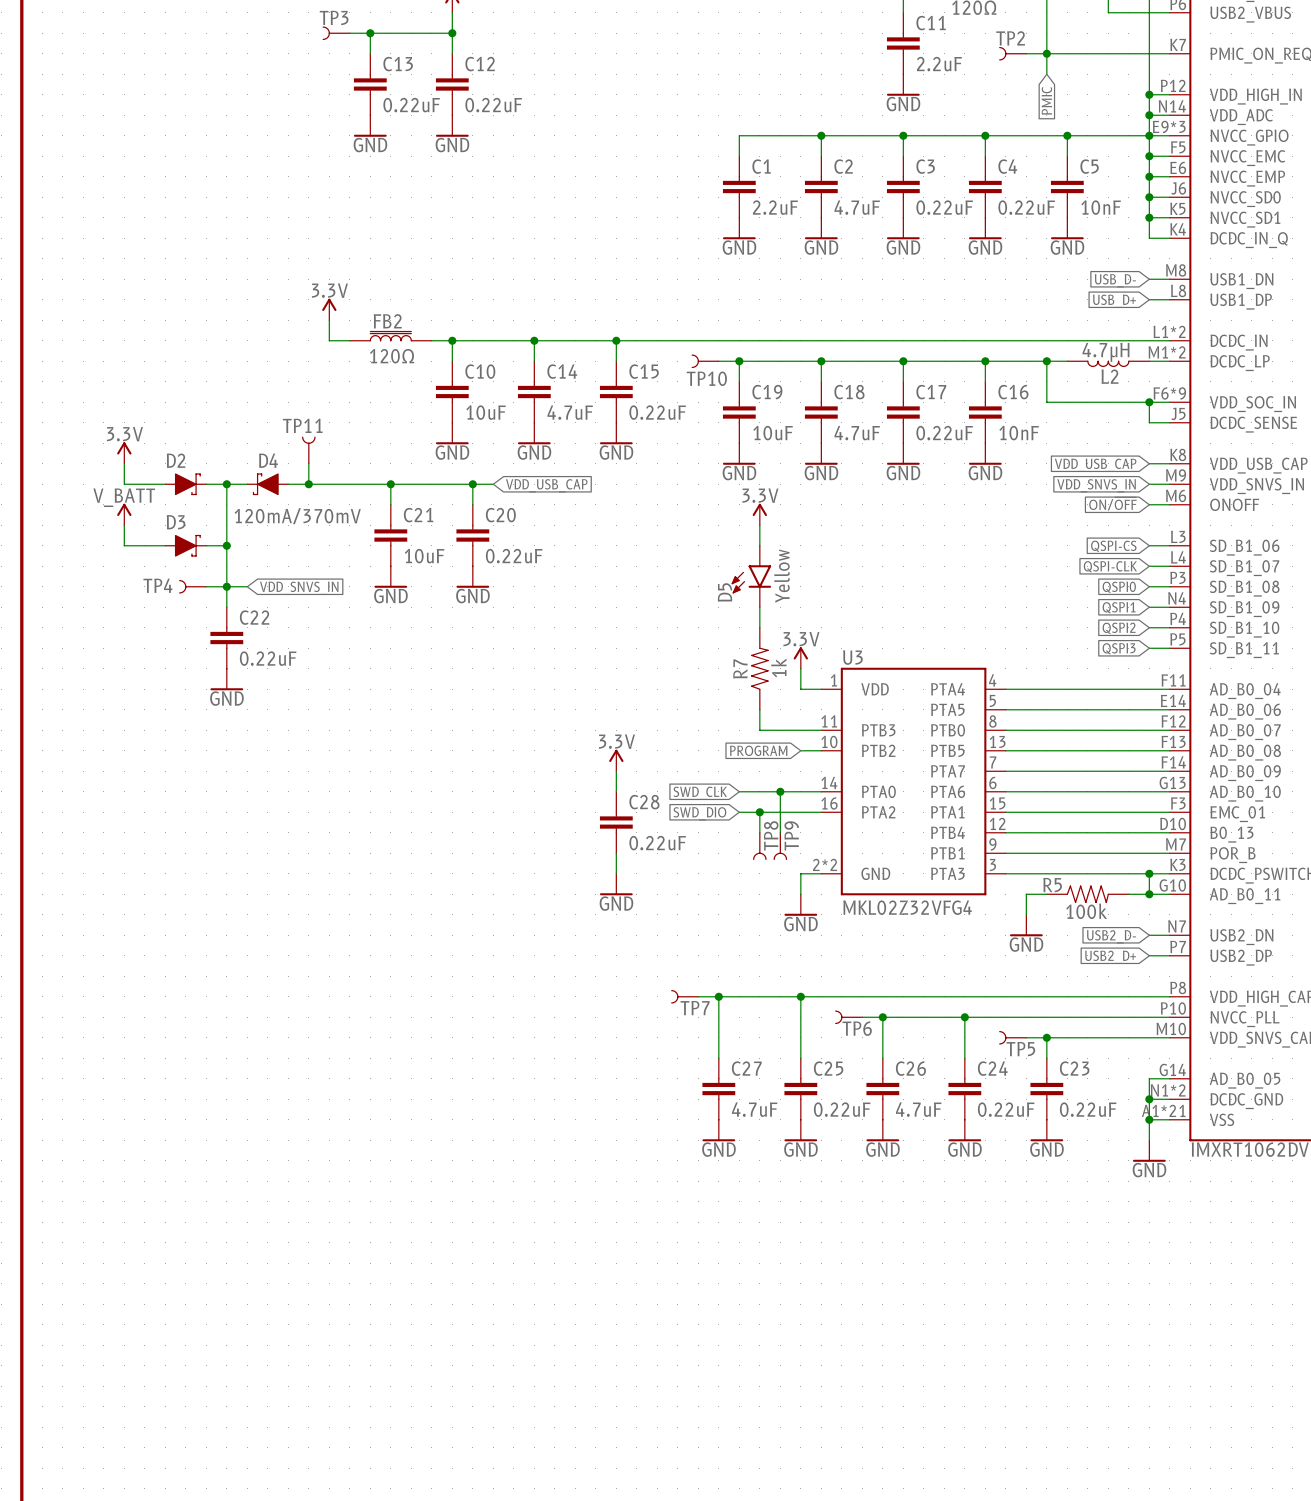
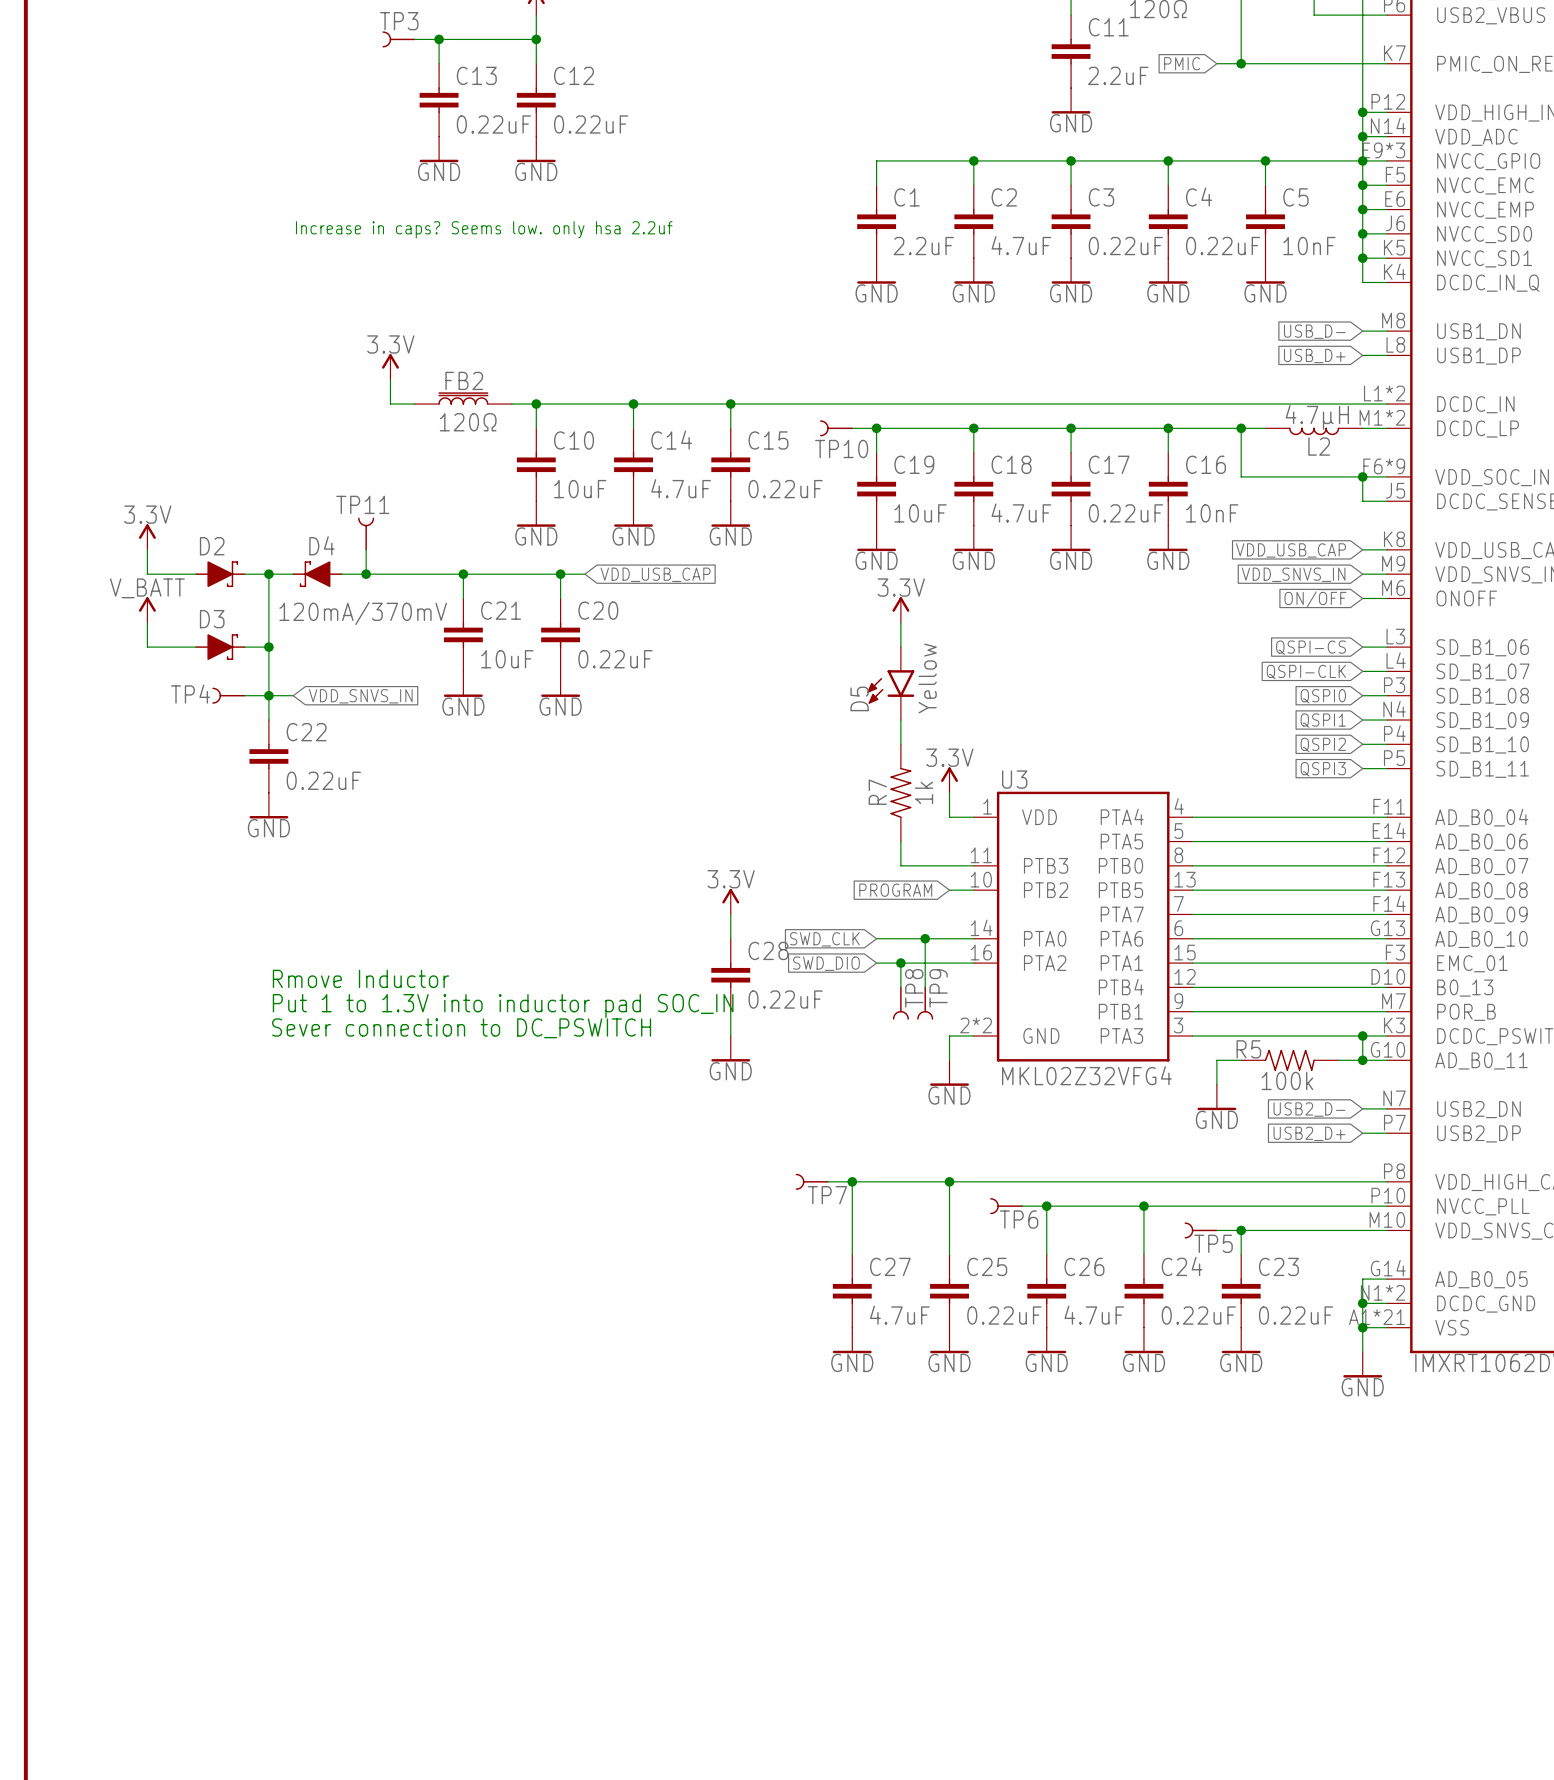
TP2: (1013, 53) -> none
wire: (1046, 53) (1046, 74) -> none
global label rotation: 0° (1046, 100) -> 90° clockwise (1182, 63)
global label position: PMIC (1046, 100) -> PMIC (1182, 63)
text: none -> Increase in caps? Seems low. only hsa 2.2uf (484, 229)
text: none -> Rmove Inductor (360, 978)
text: none -> Put 1 to 1.3V into inductor pad SOC_IN (503, 1006)
text: none -> Sever connection to DC_PSWITCH (461, 1028)

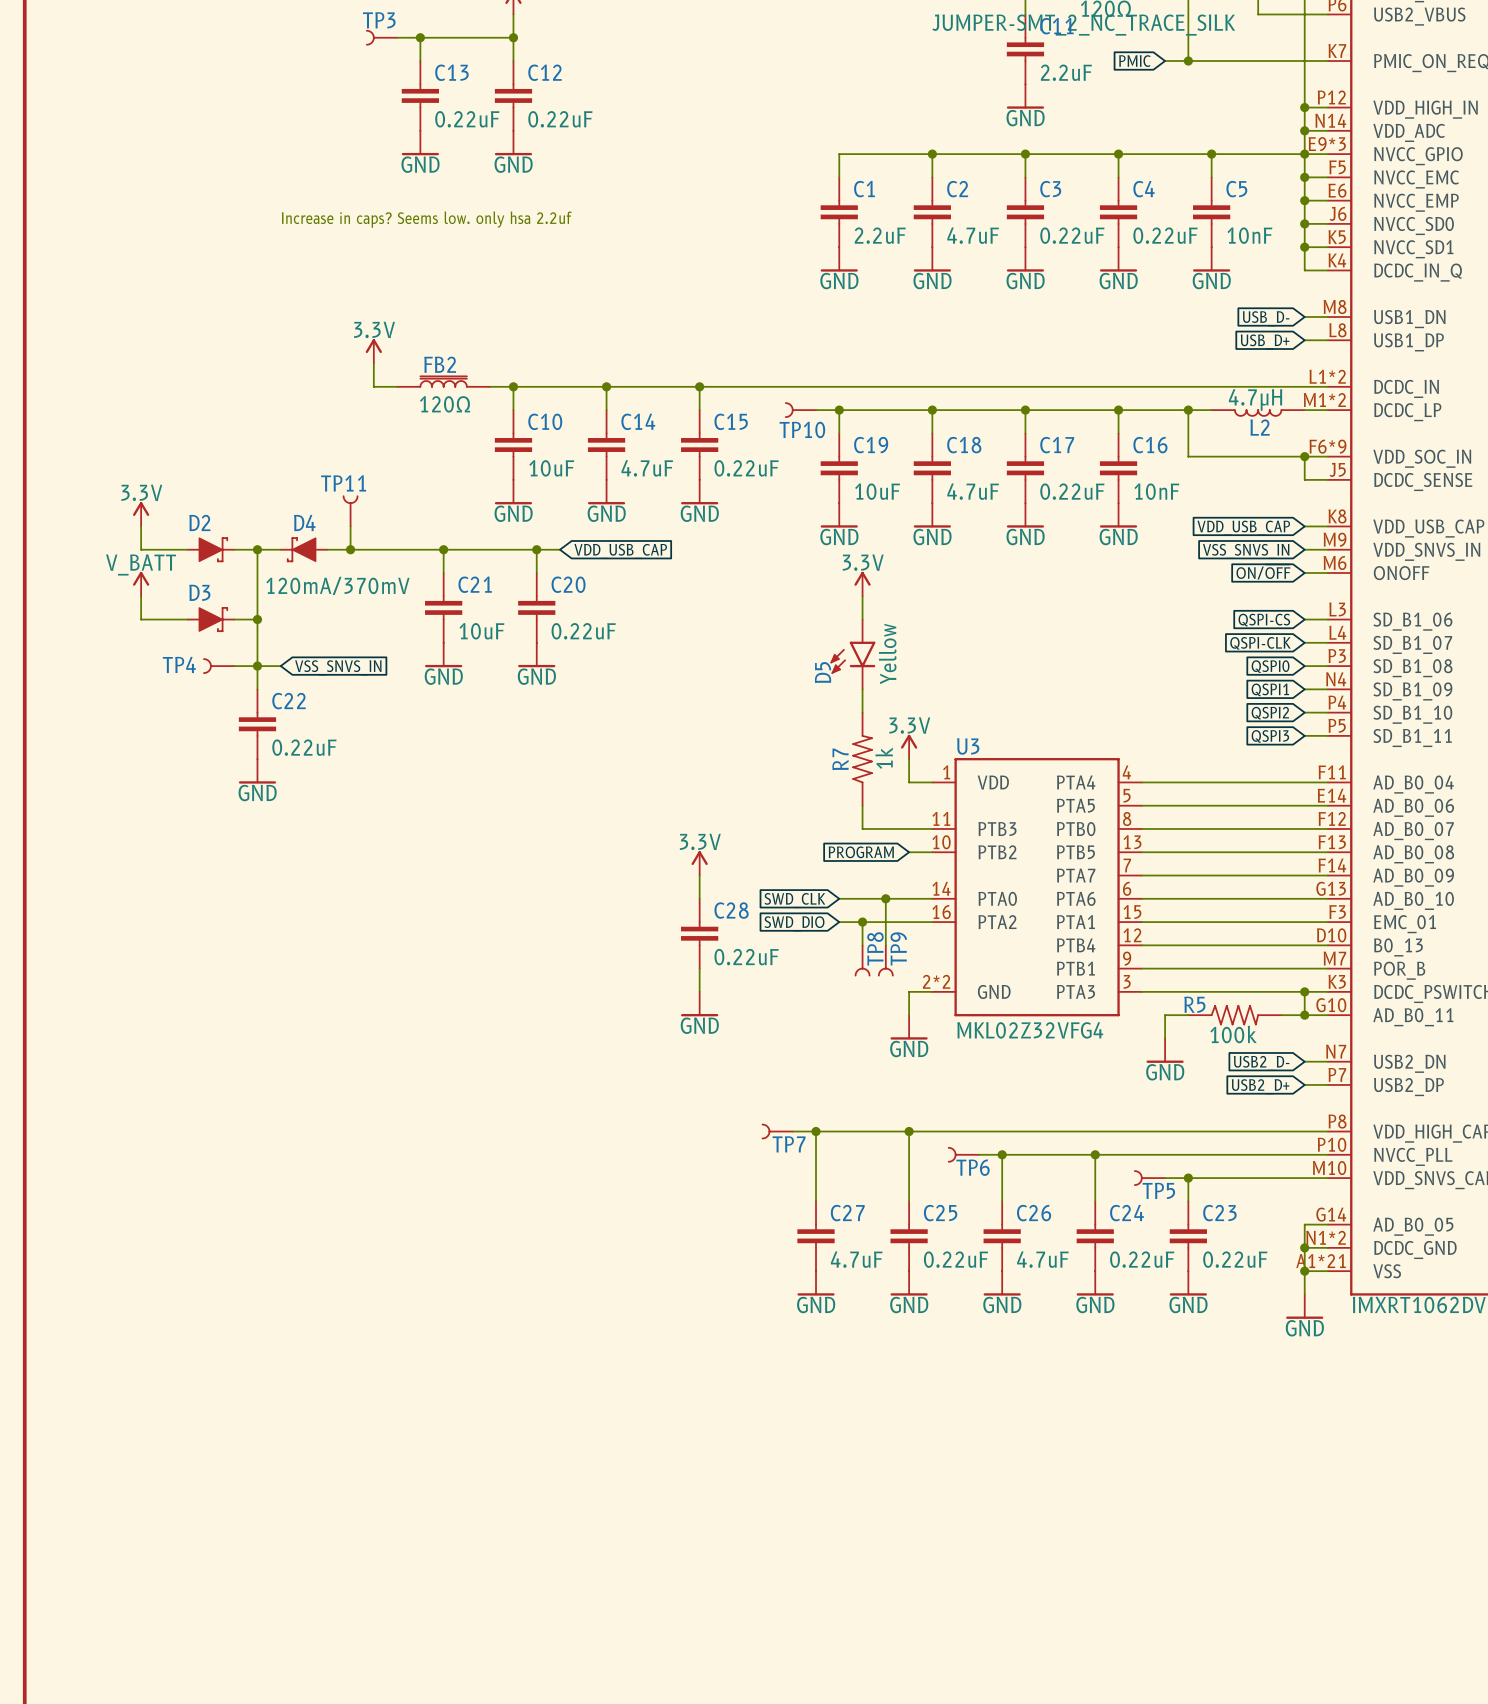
part value: none -> JUMPER-SMT_2_NC_TRACE_SILK (1083, 25)
global label: VDD_SNVS_IN (1293, 574) -> VSS_SNVS_IN (1246, 551)
global label: VDD_SNVS_IN (360, 696) -> VSS_SNVS_IN (338, 667)
text: Rmove Inductor (360, 978) -> none
text: Put 1 to 1.3V into inductor pad SOC_IN (503, 1006) -> none
text: Sever connection to DC_PSWITCH (461, 1028) -> none

